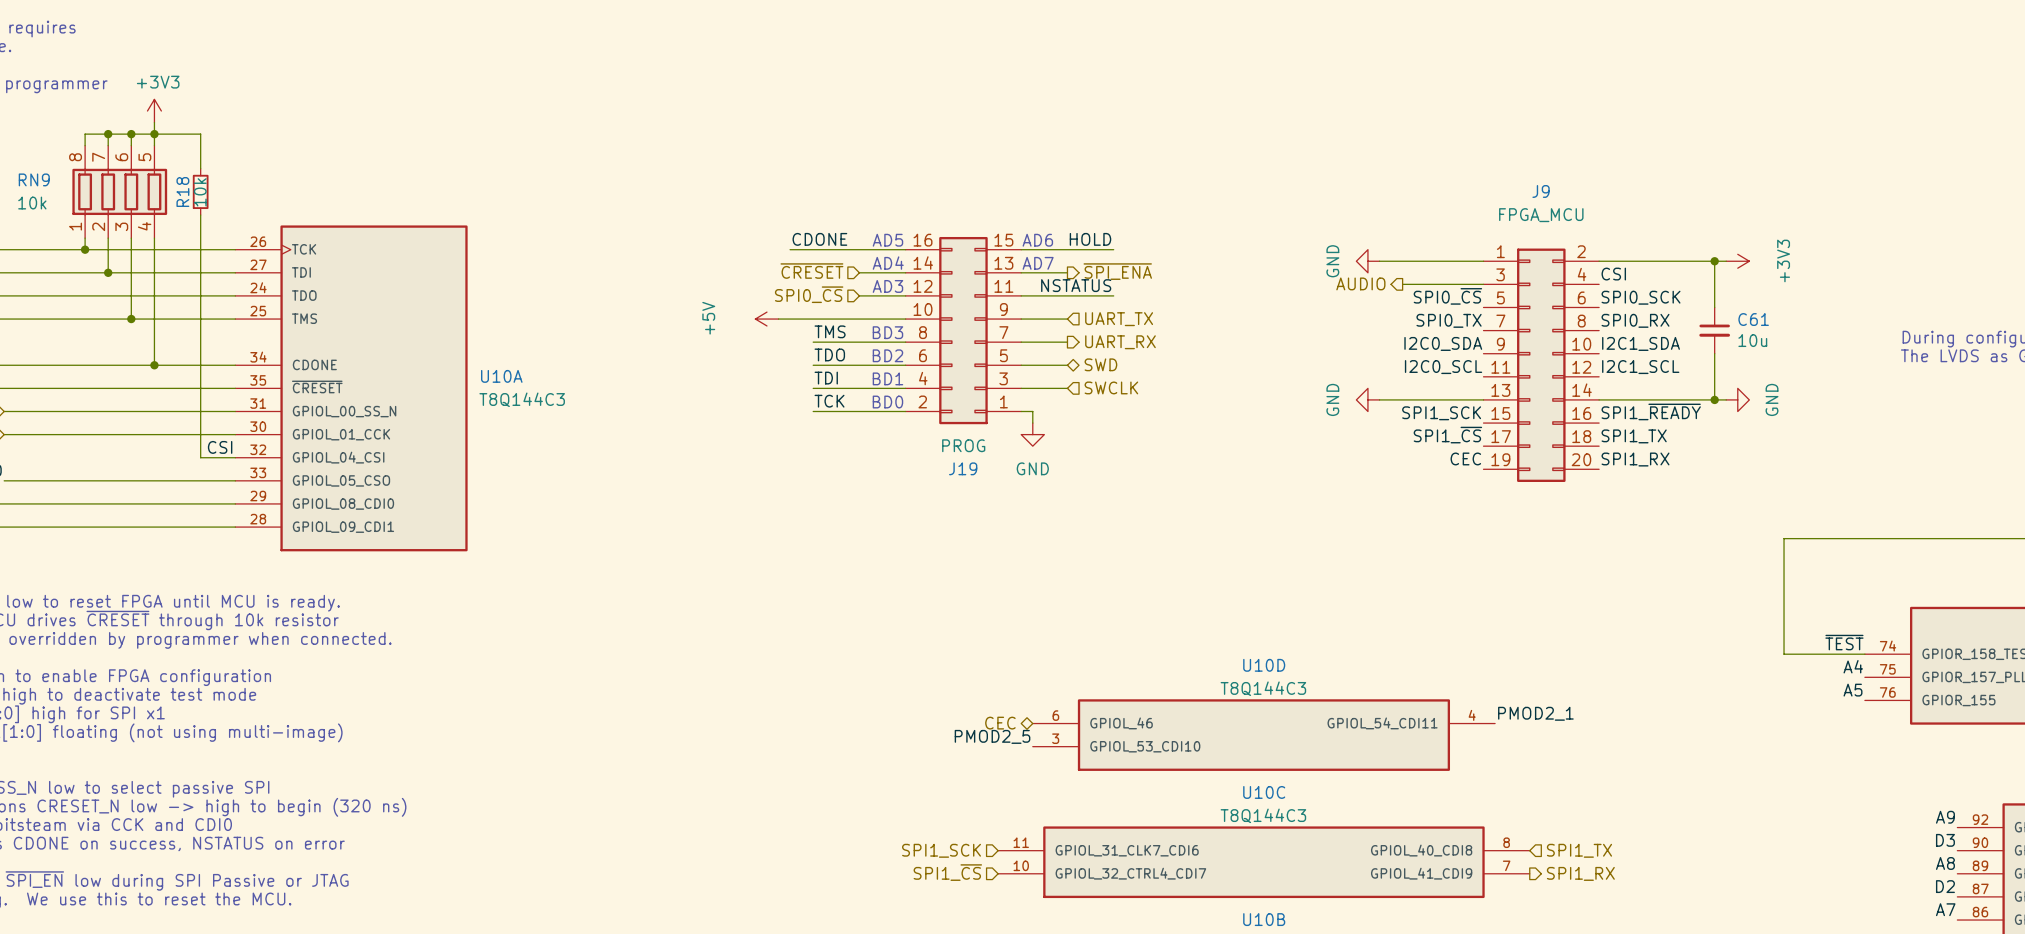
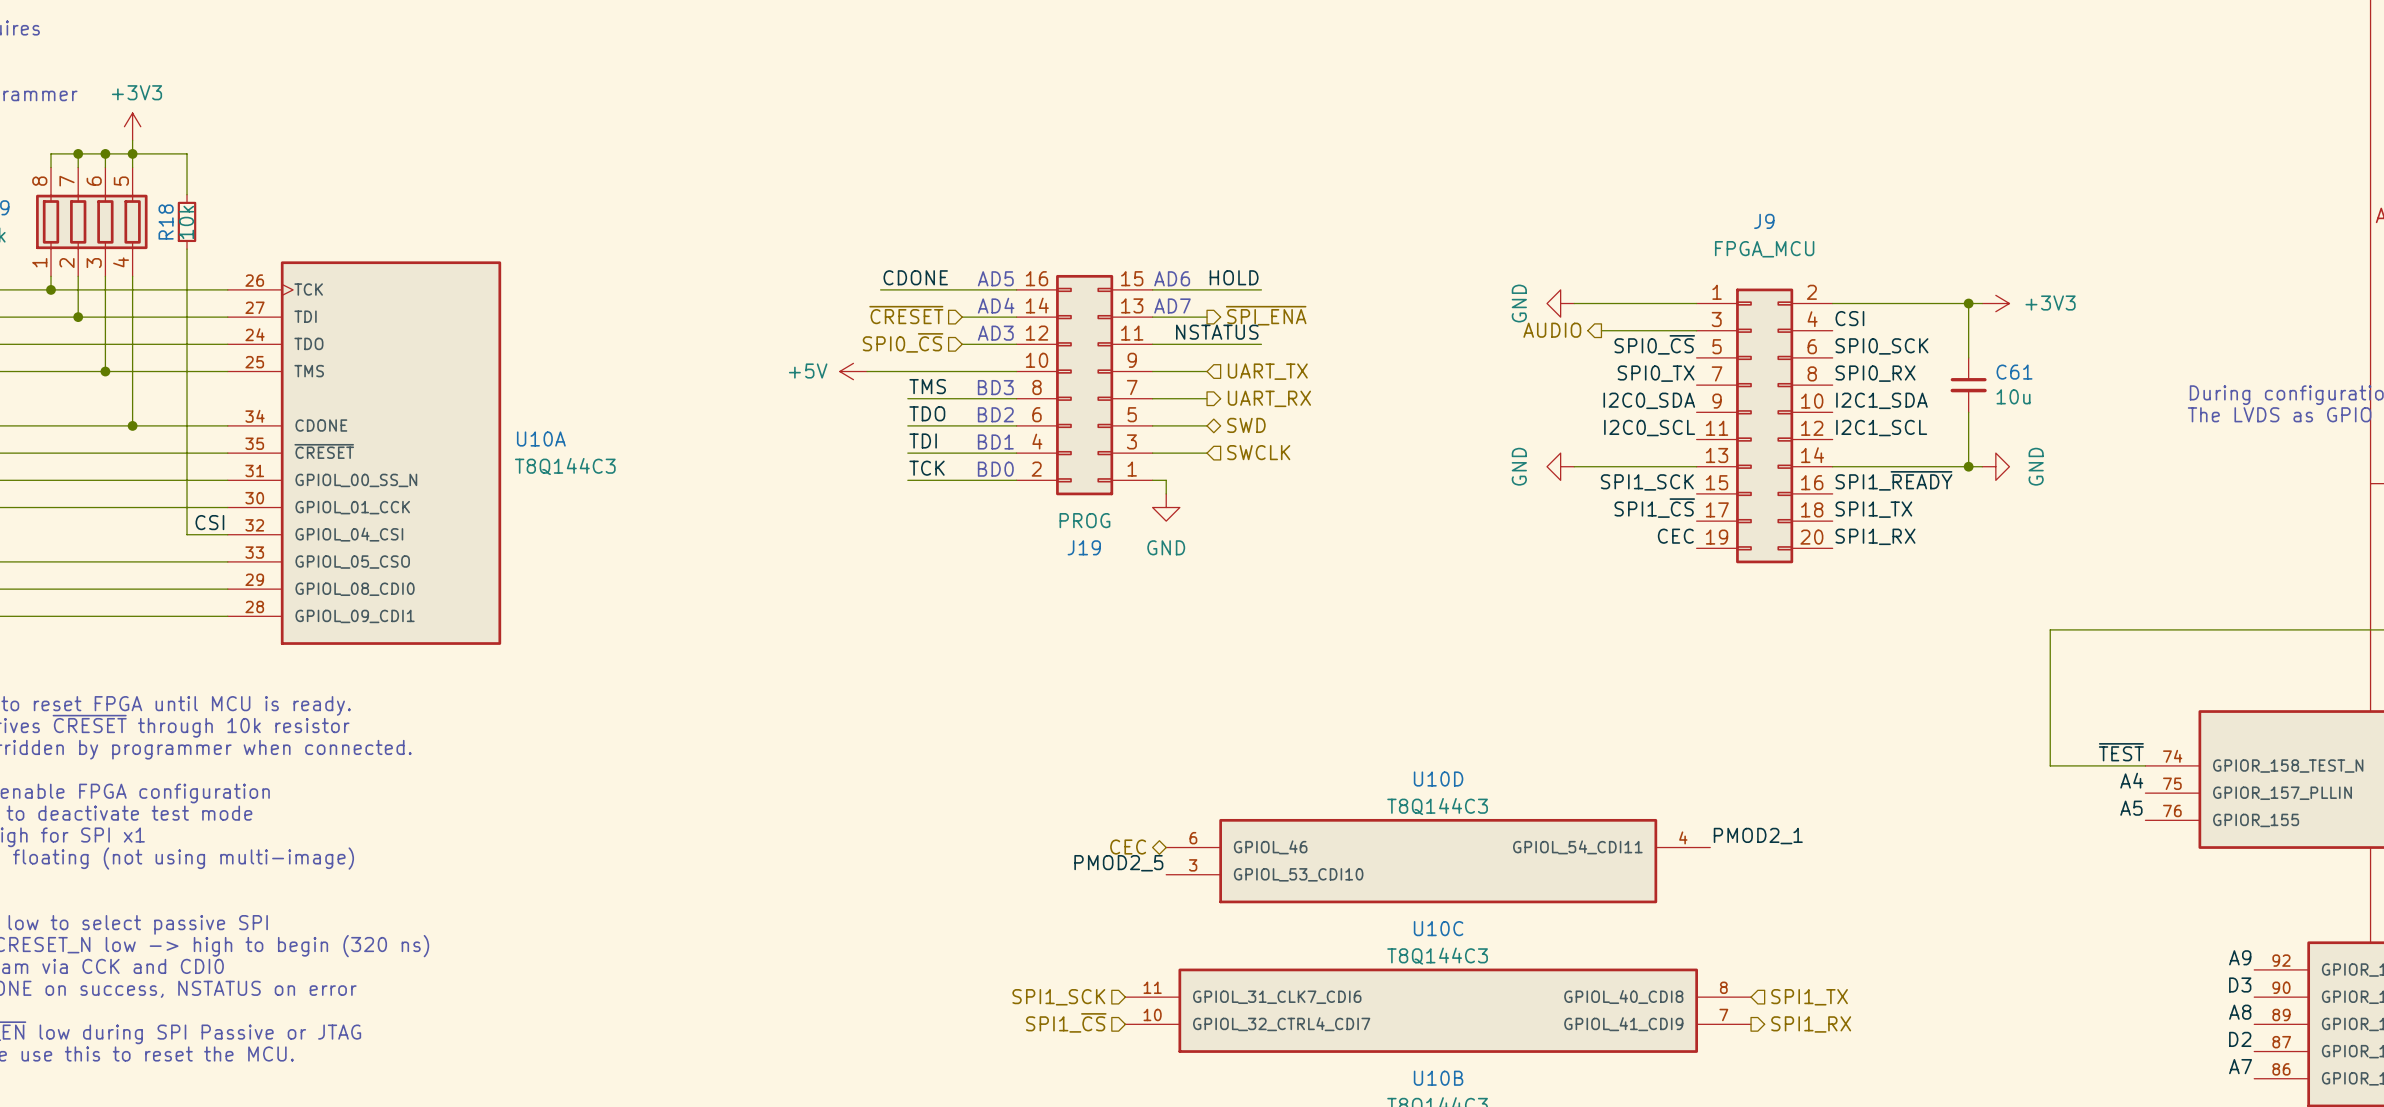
power symbol text rotation: 0° (1783, 260) -> 90° clockwise (2050, 303)
power symbol text rotation: 0° (708, 318) -> 90° clockwise (808, 371)

